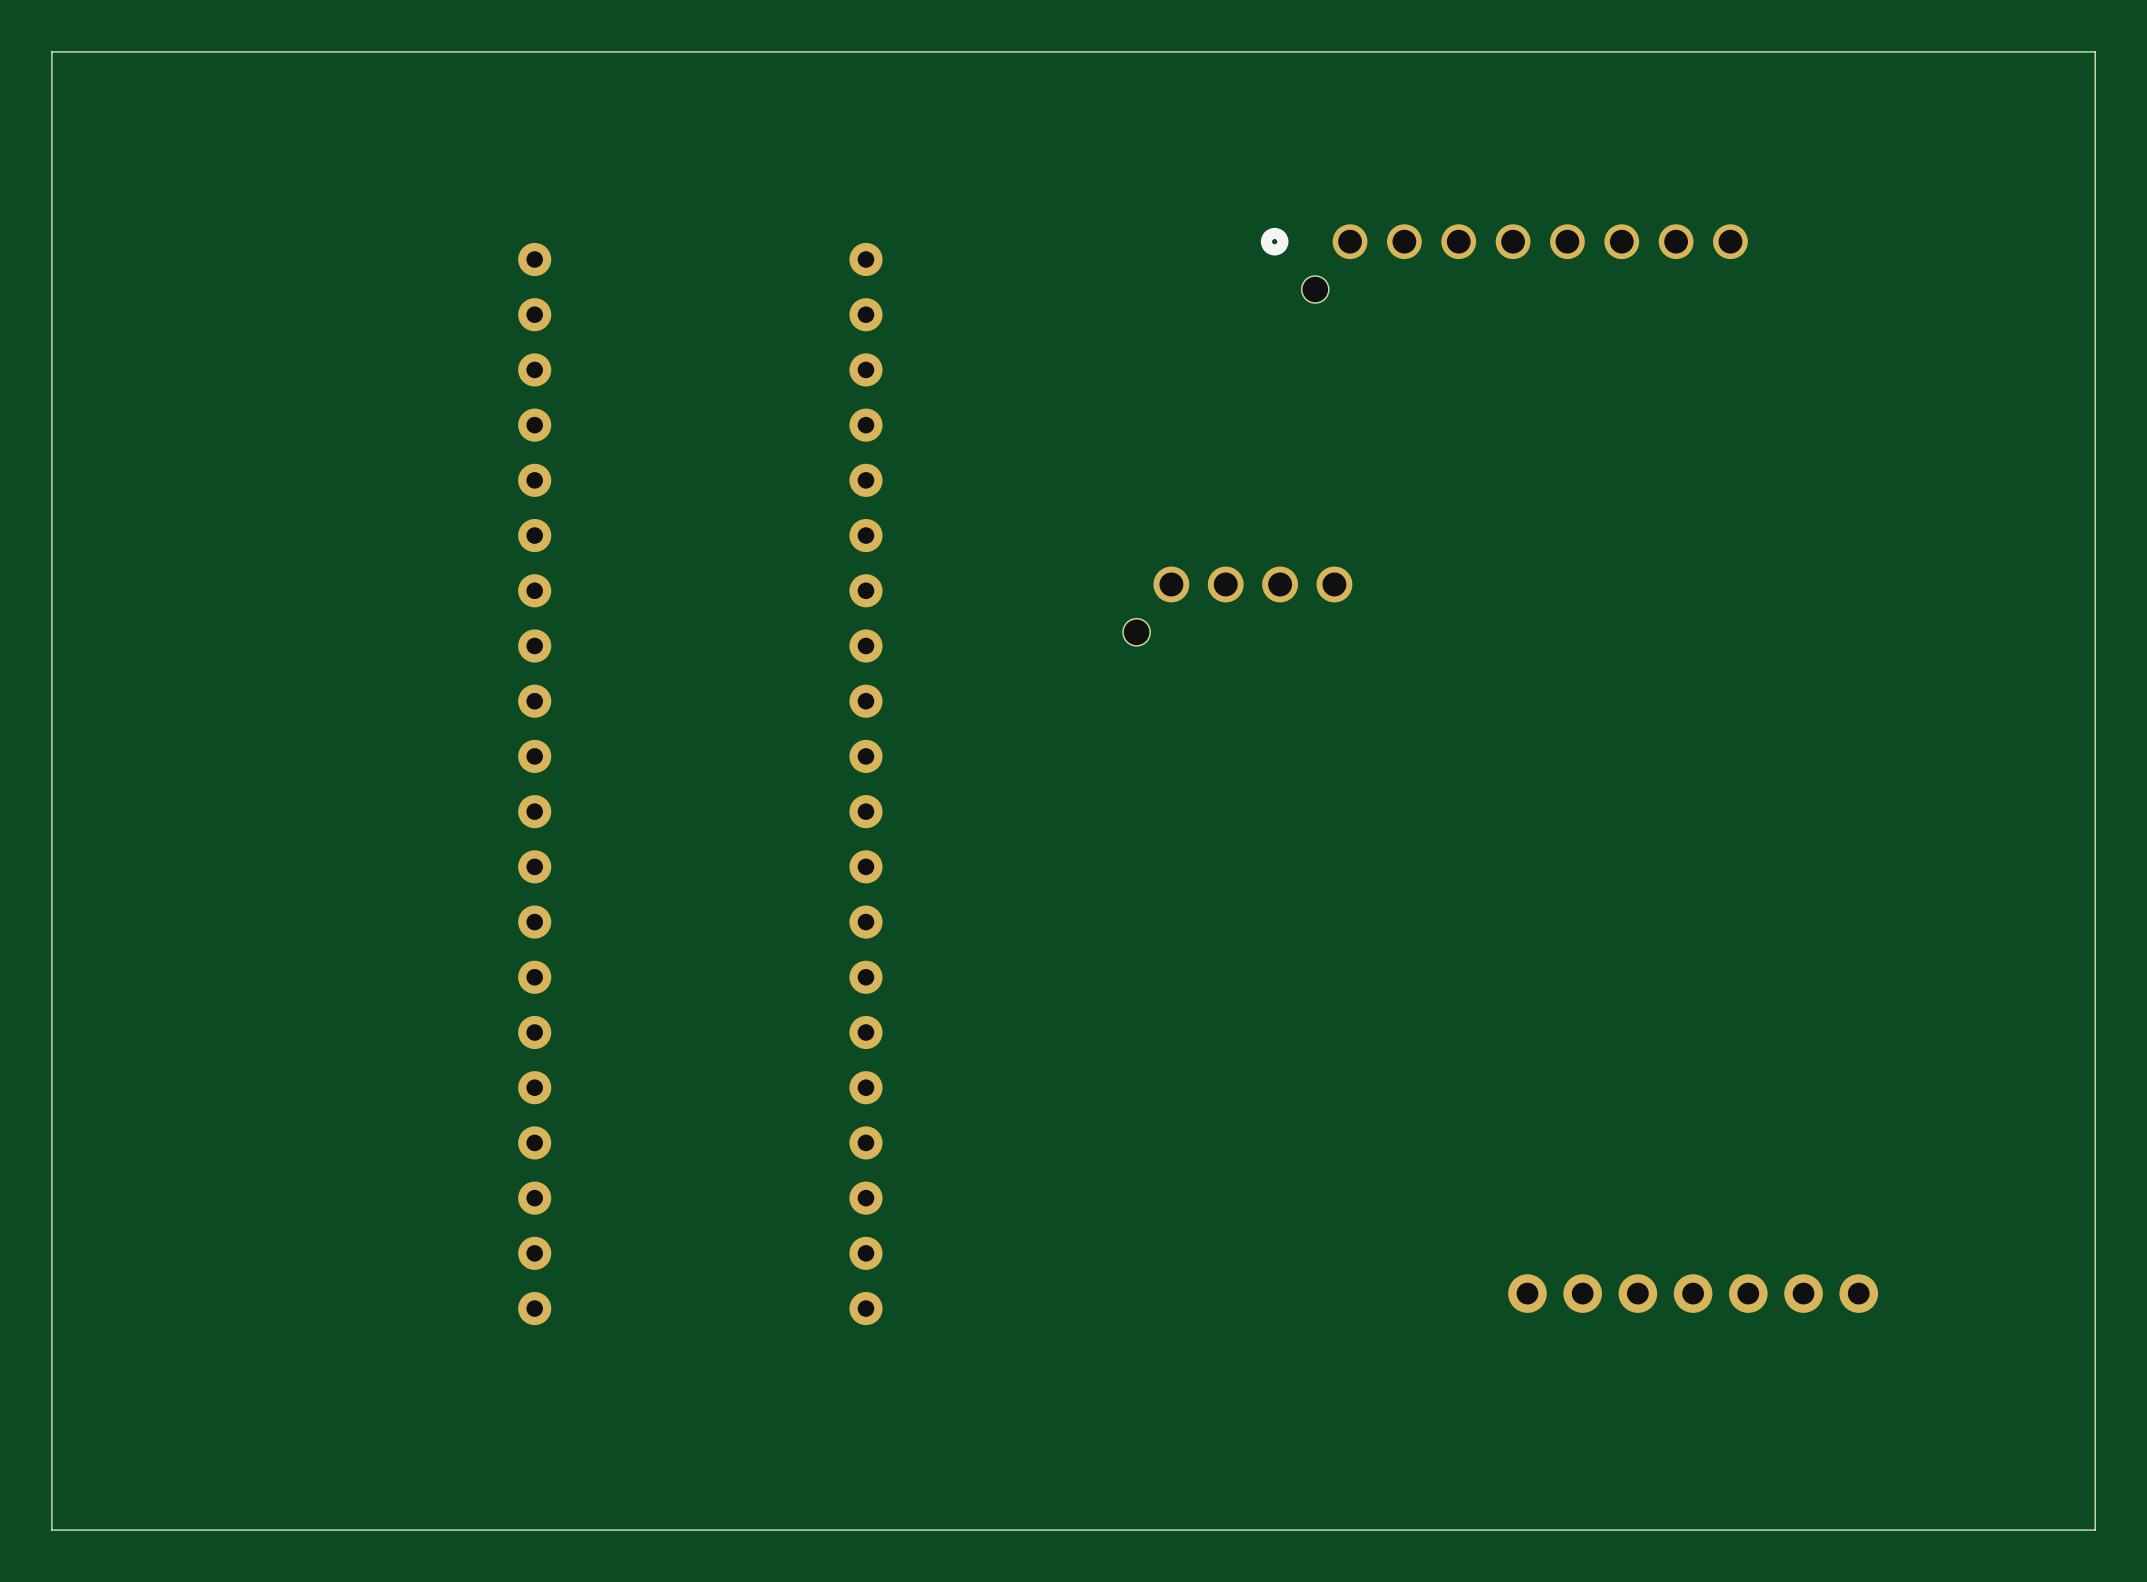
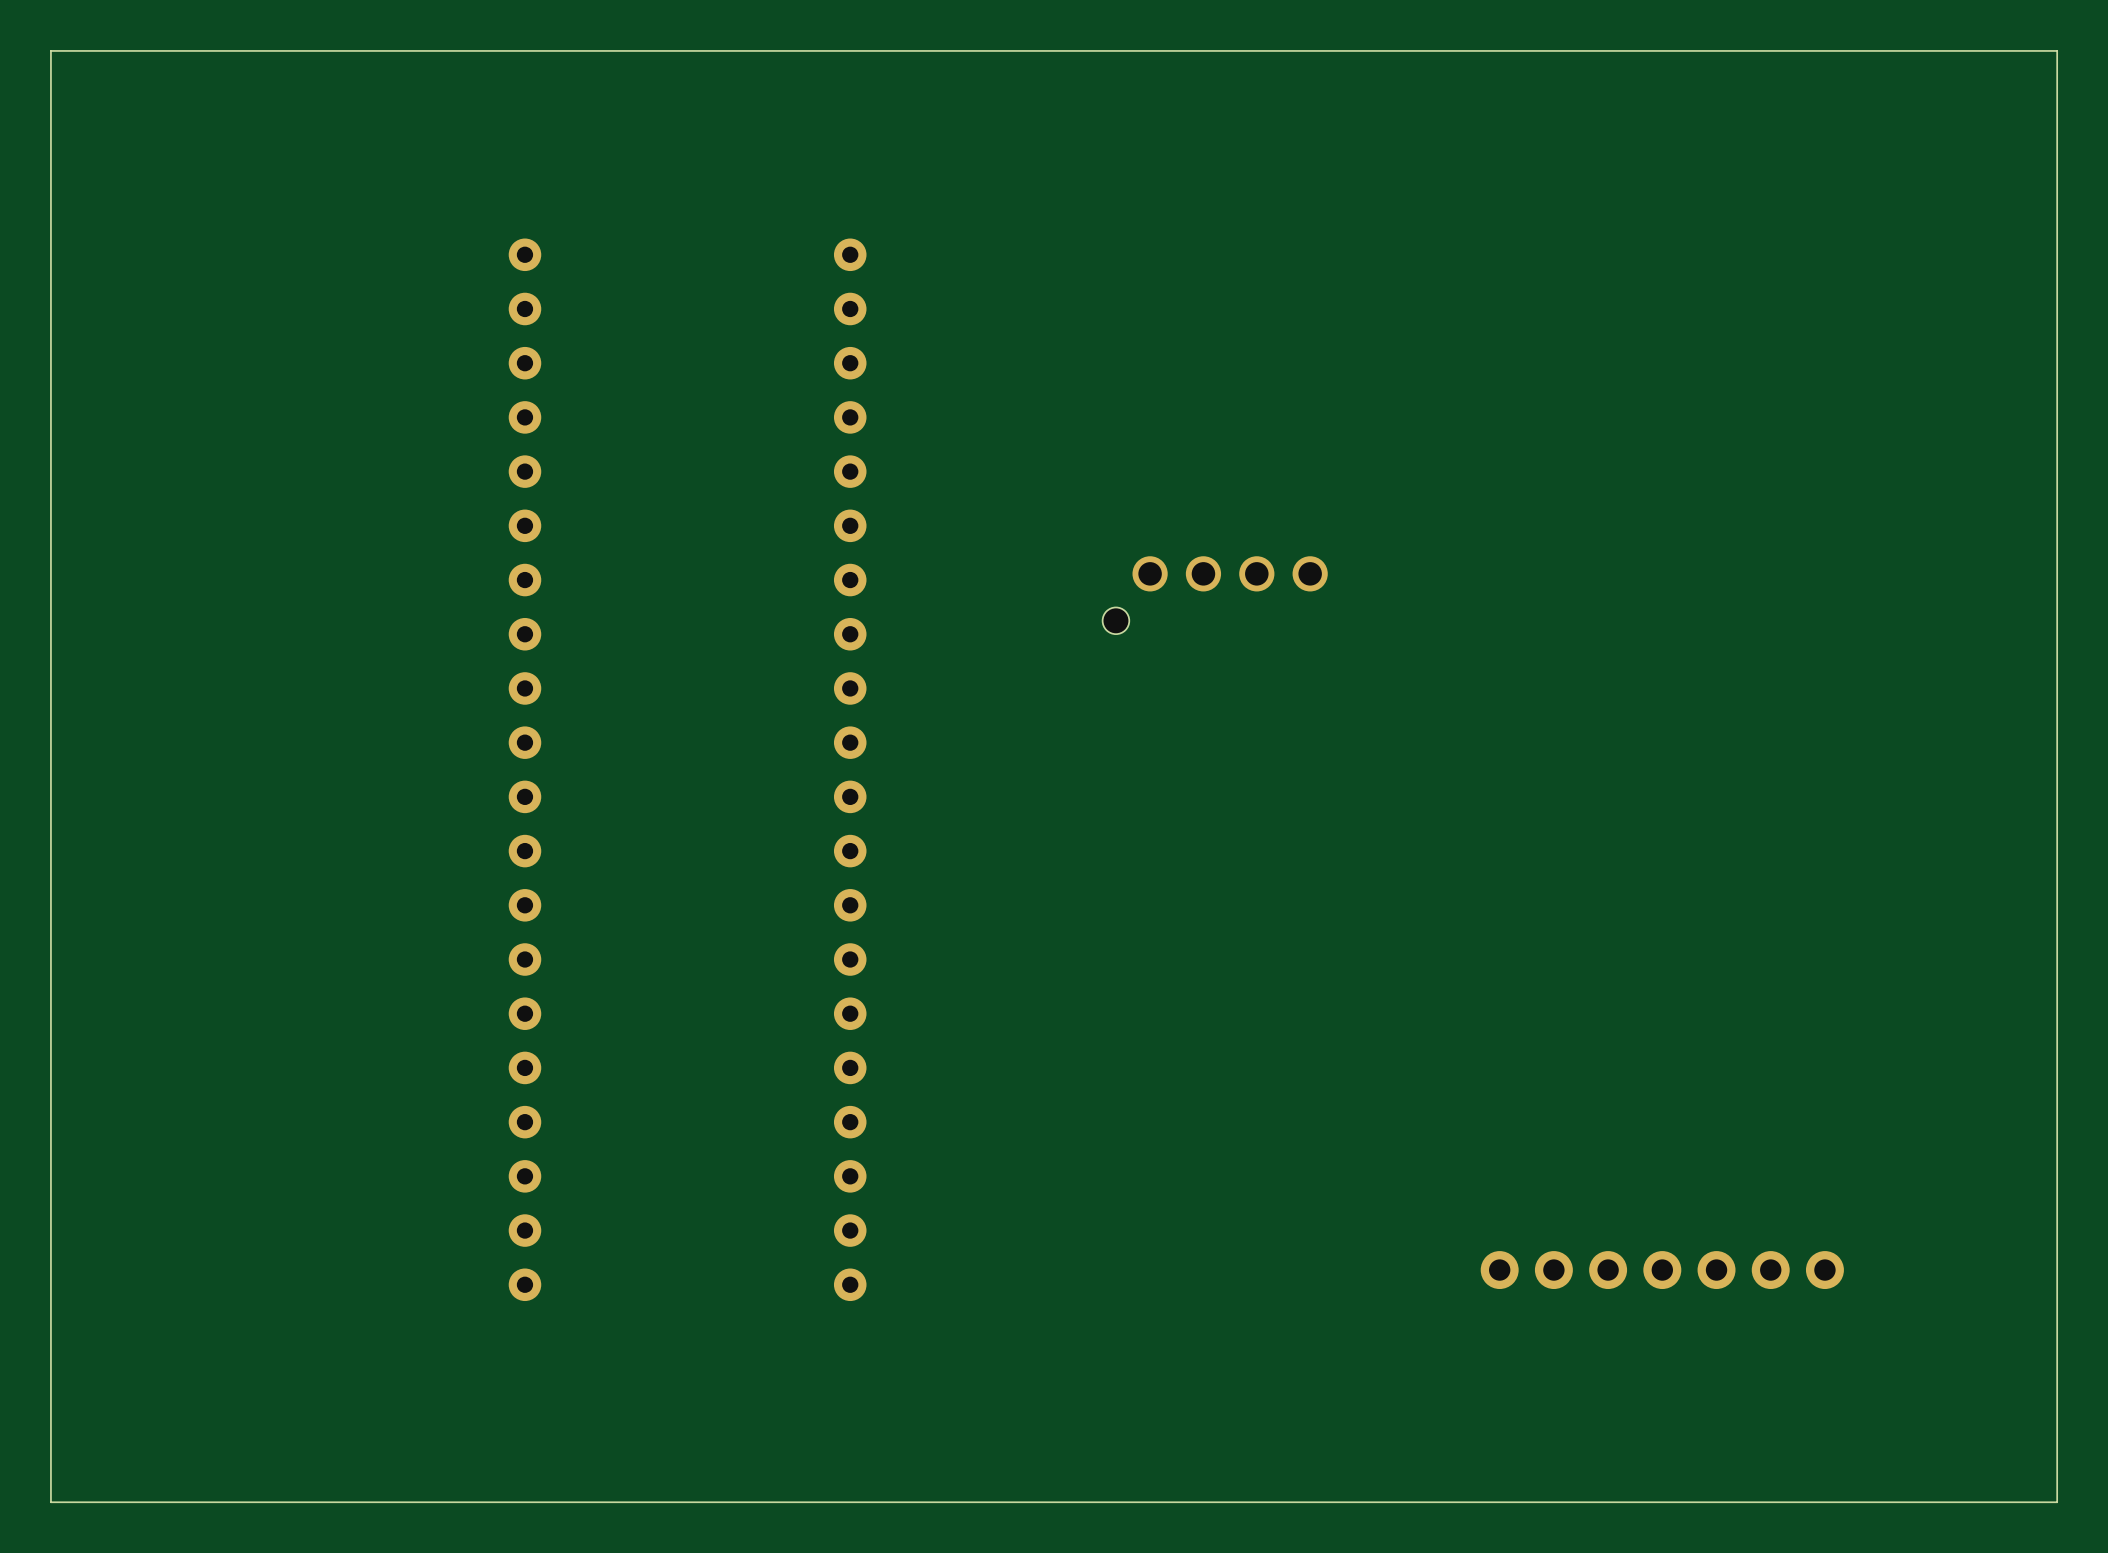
part: (1504, 263) -> none

